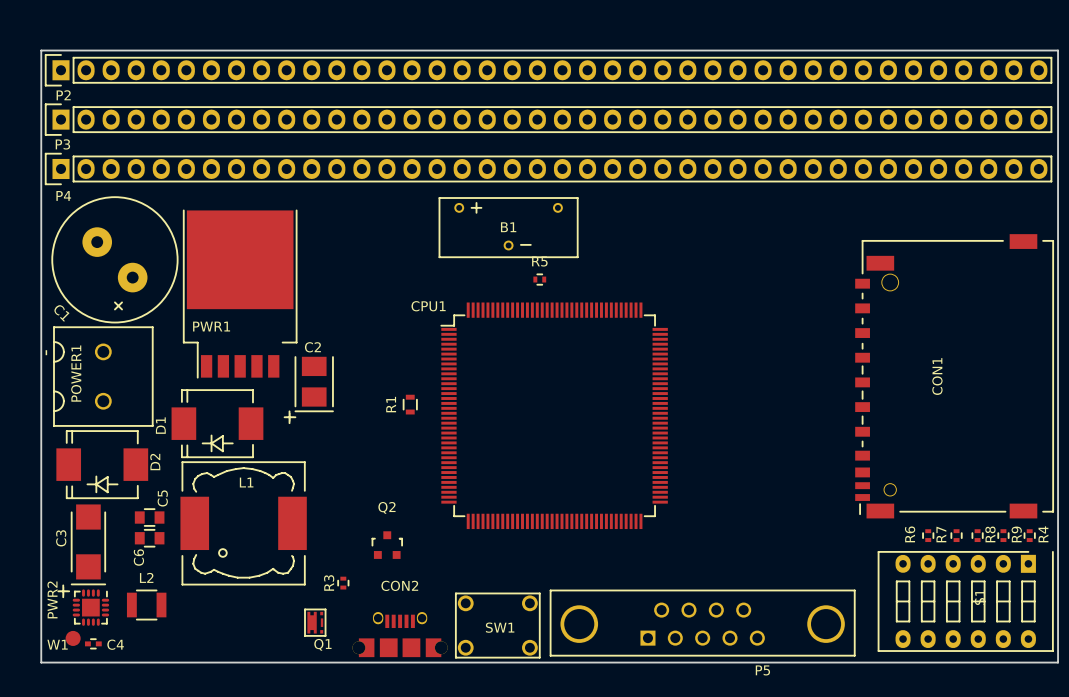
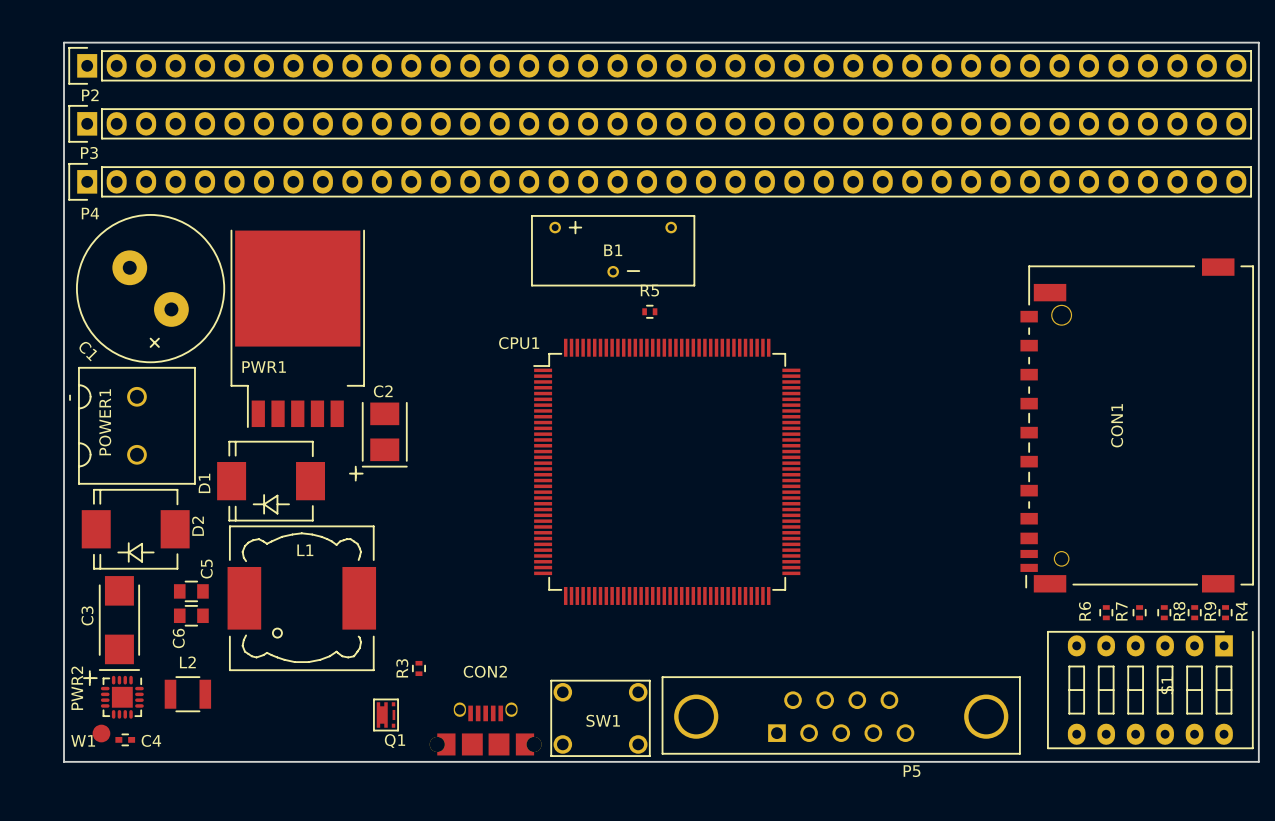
R1: (410, 404) -> none
Q2: (387, 545) -> none

